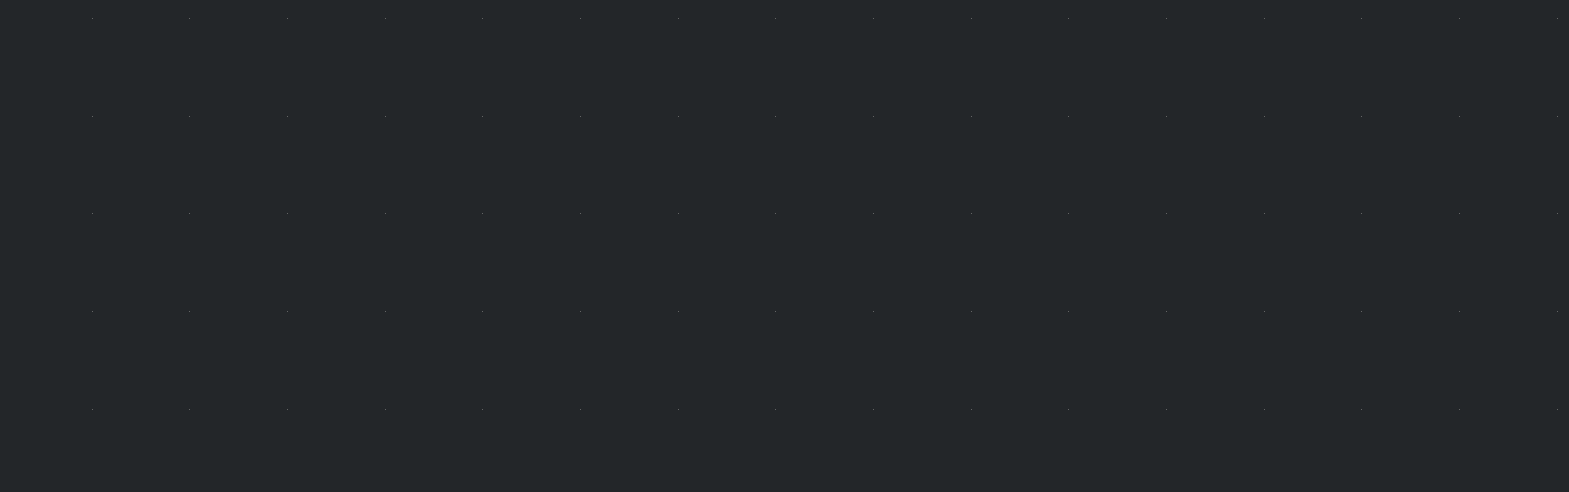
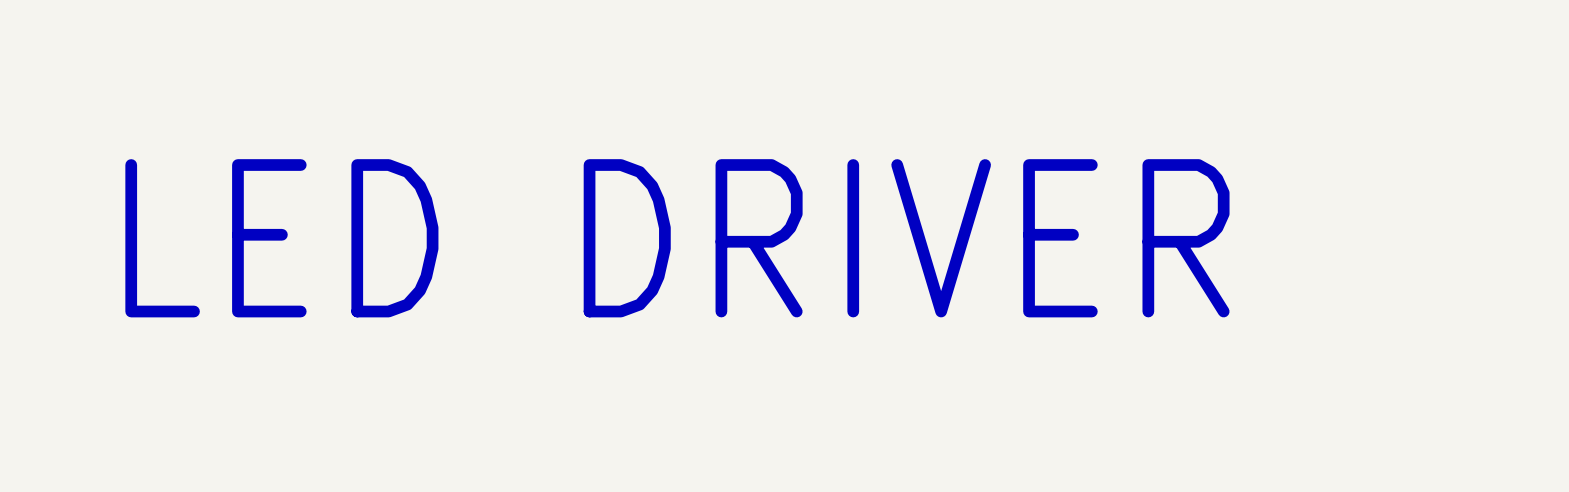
text: none -> LED DRIVER (677, 238)

